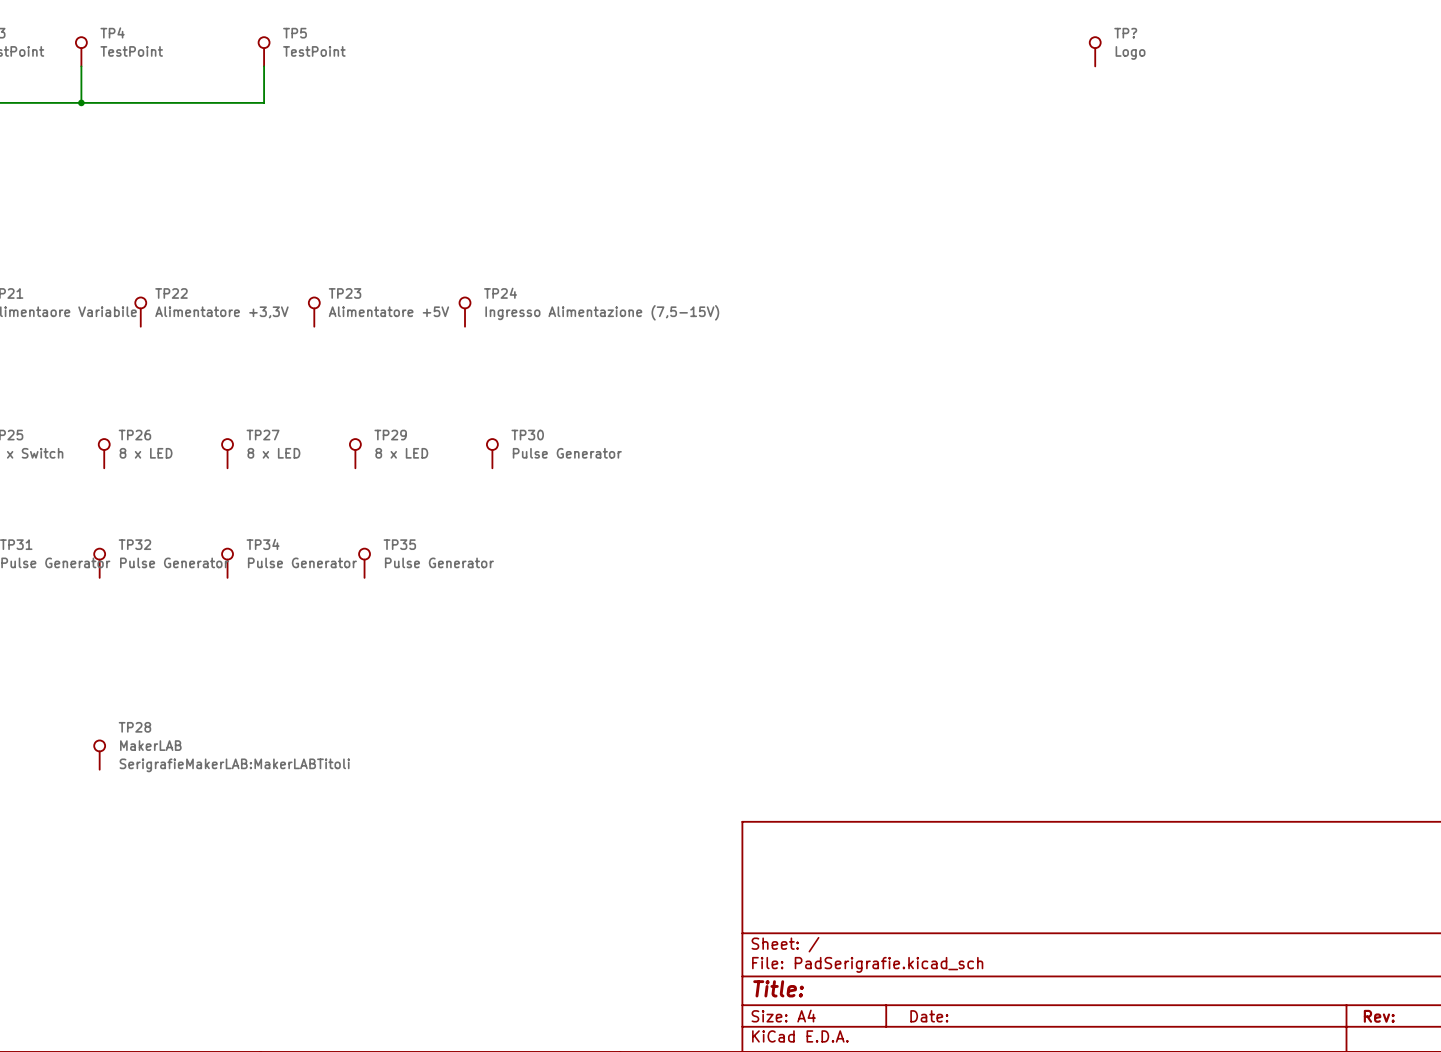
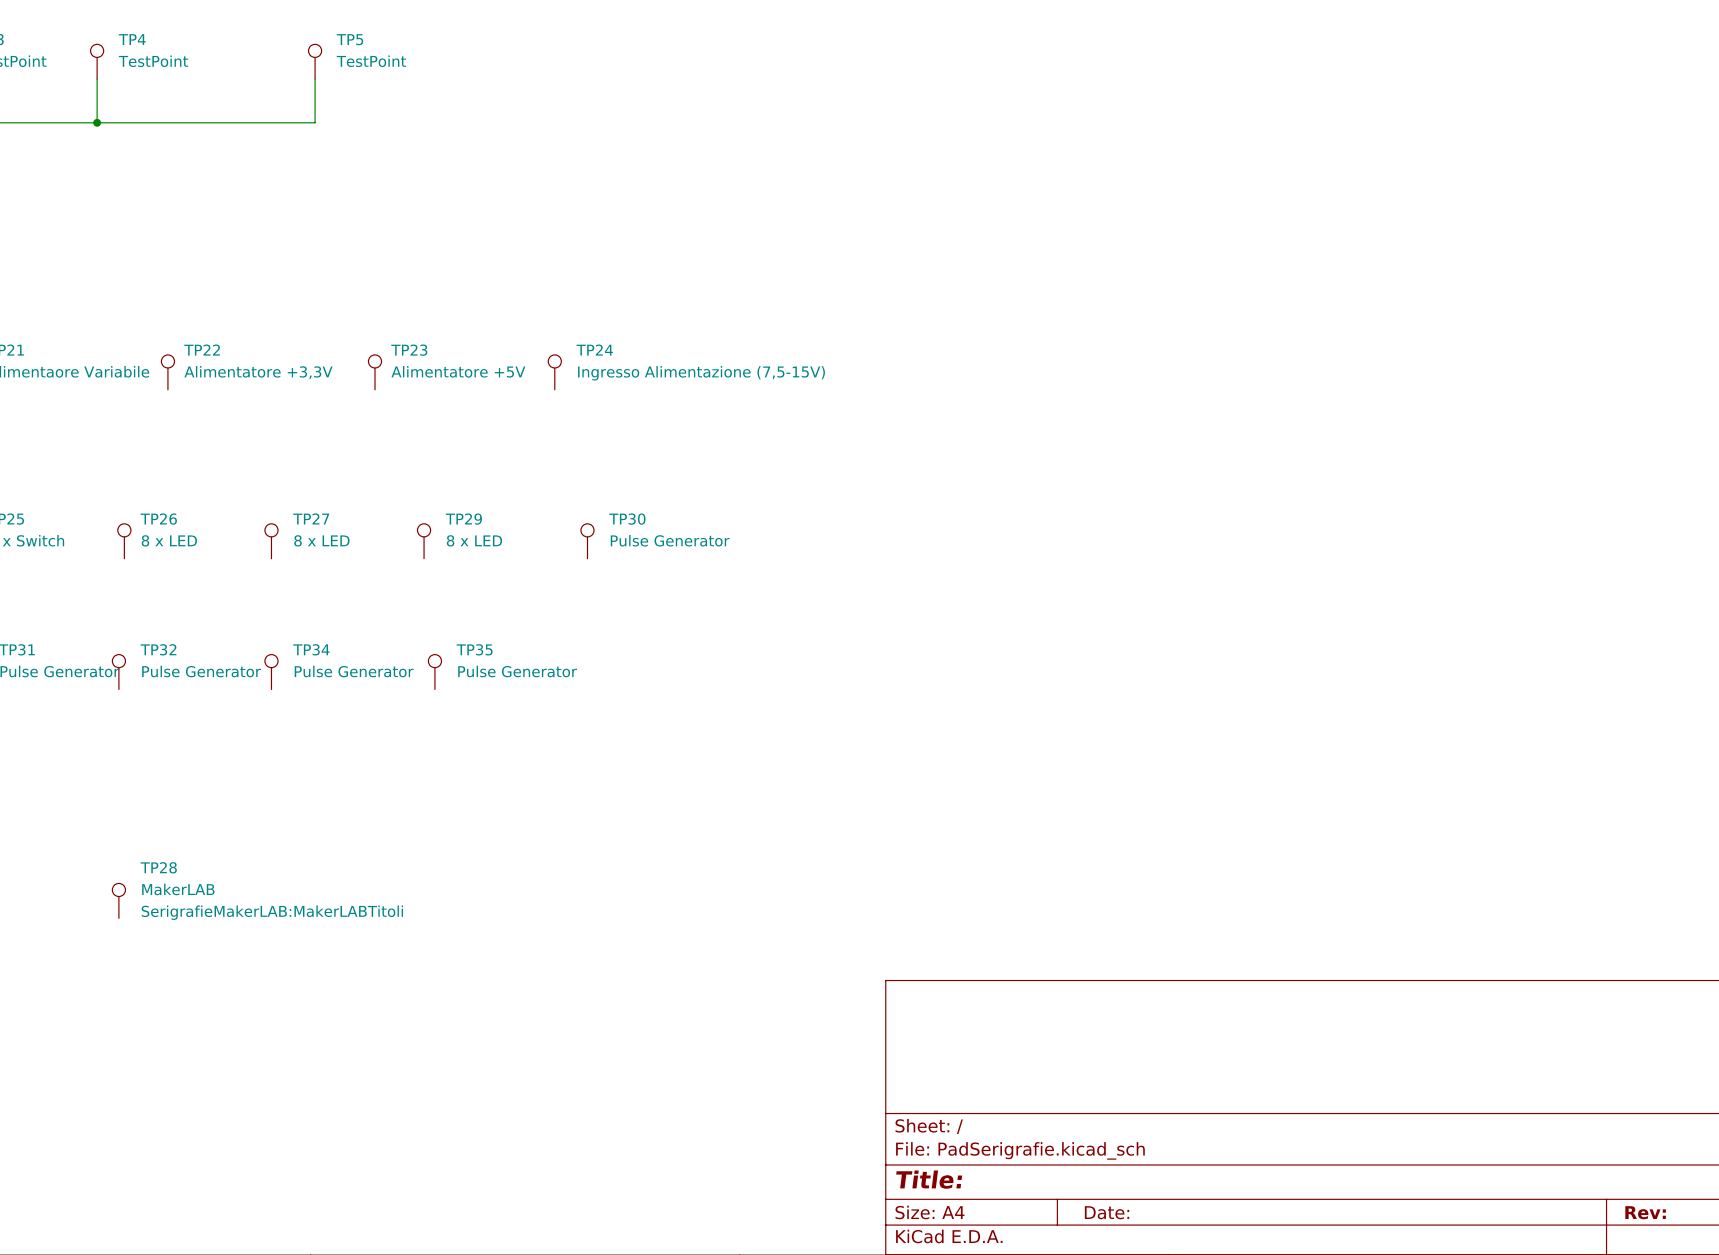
TP?: Logo (1095, 51) -> none

